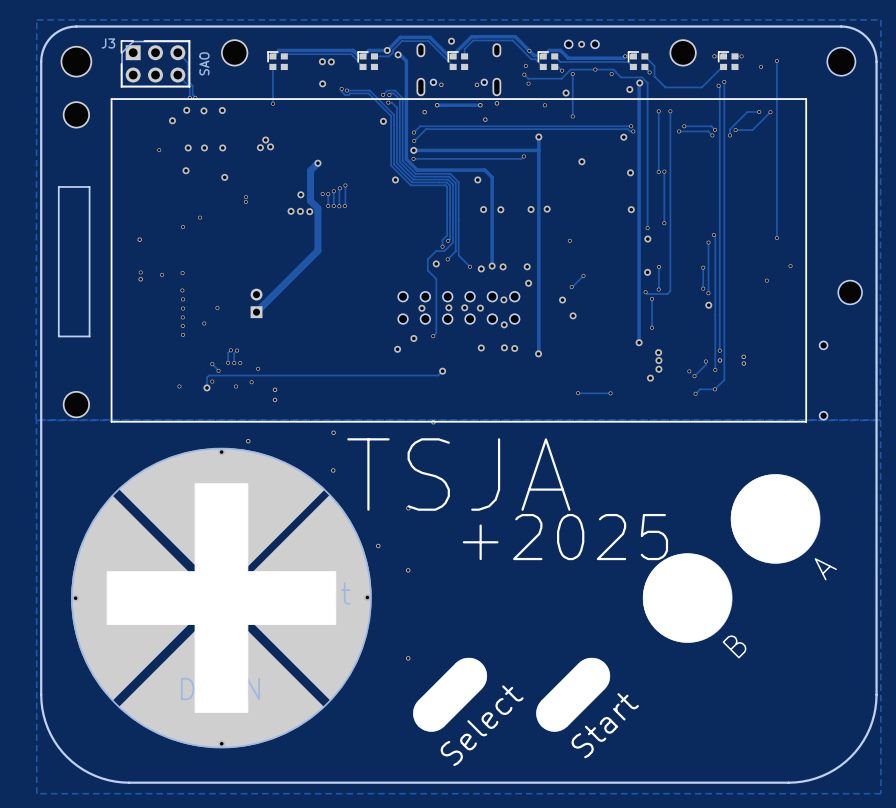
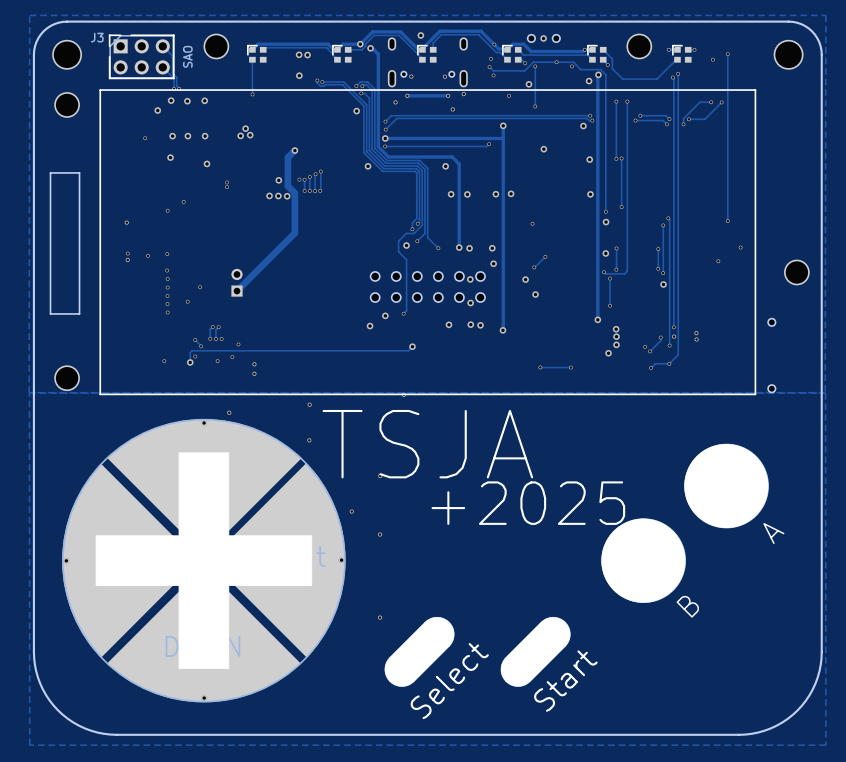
part footprint: [827, 47, 856, 76] -> [773, 39, 804, 70]
via: (481, 268) -> none
part footprint: [838, 280, 863, 305] -> [784, 259, 810, 286]
via: (448, 307) -> none
via: (464, 307) -> none
via: (421, 308) -> none
via: (480, 308) -> none

